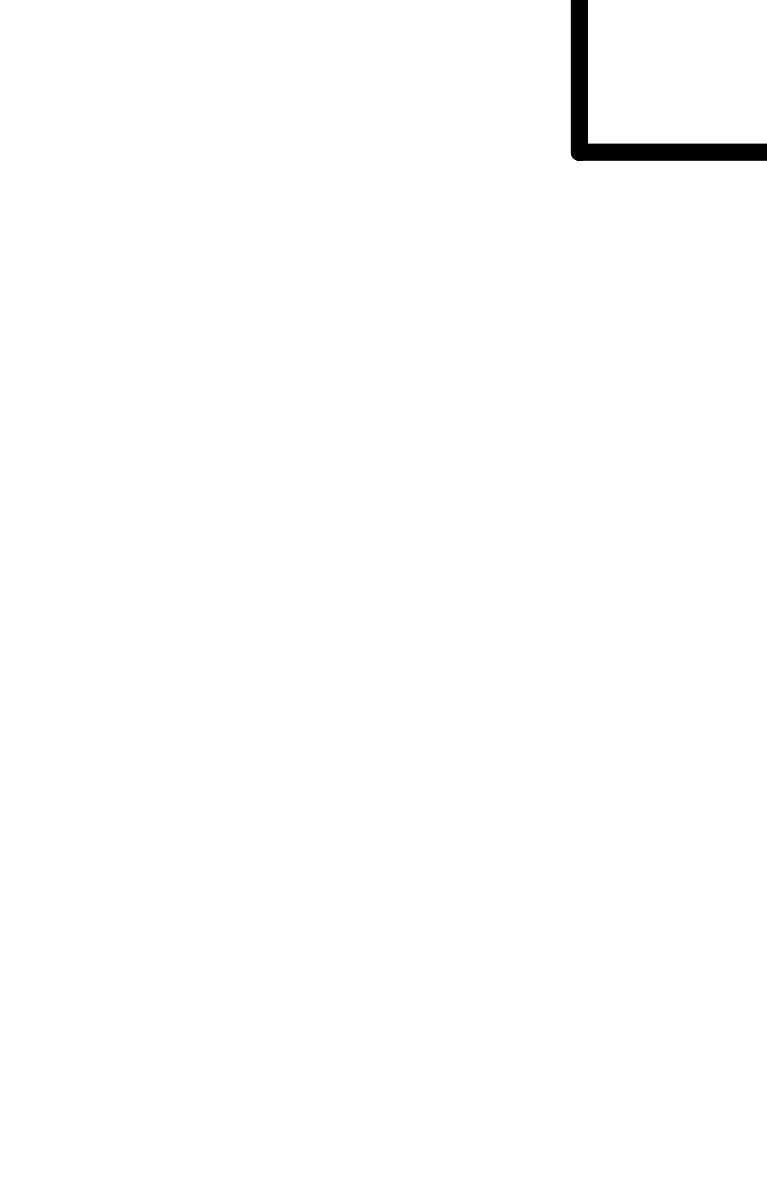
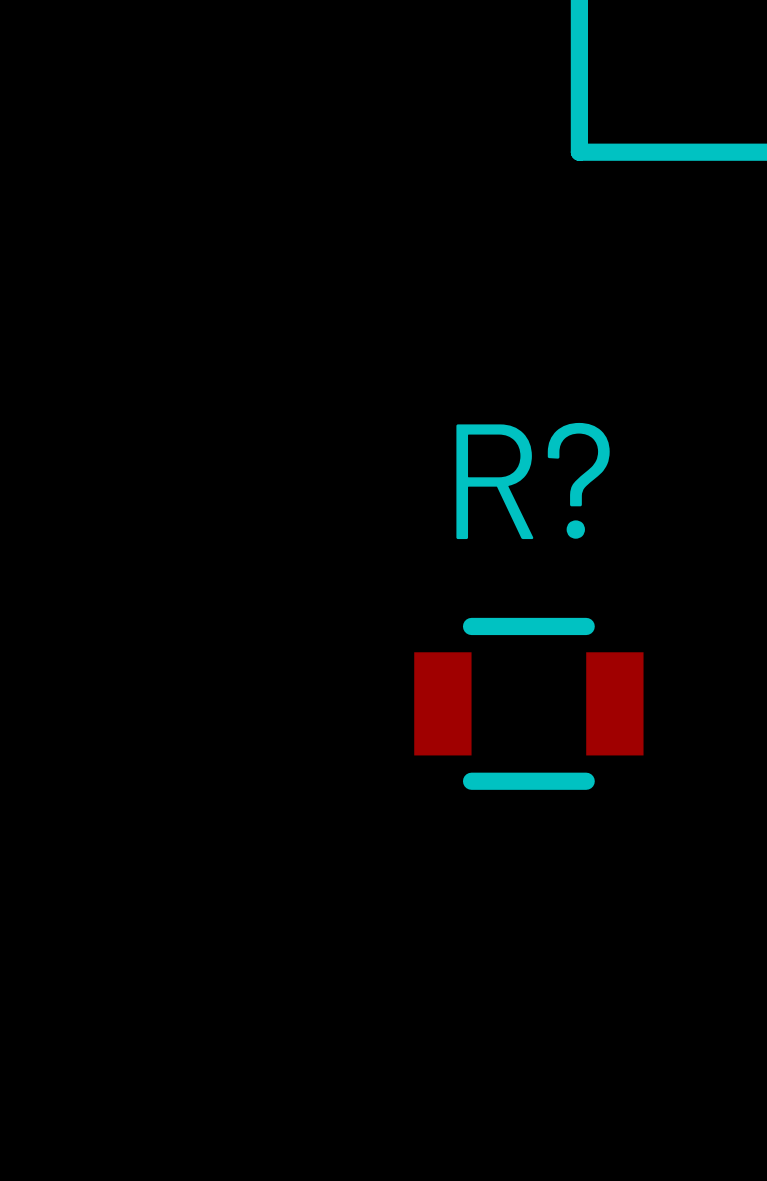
R?: none -> (528, 703)

